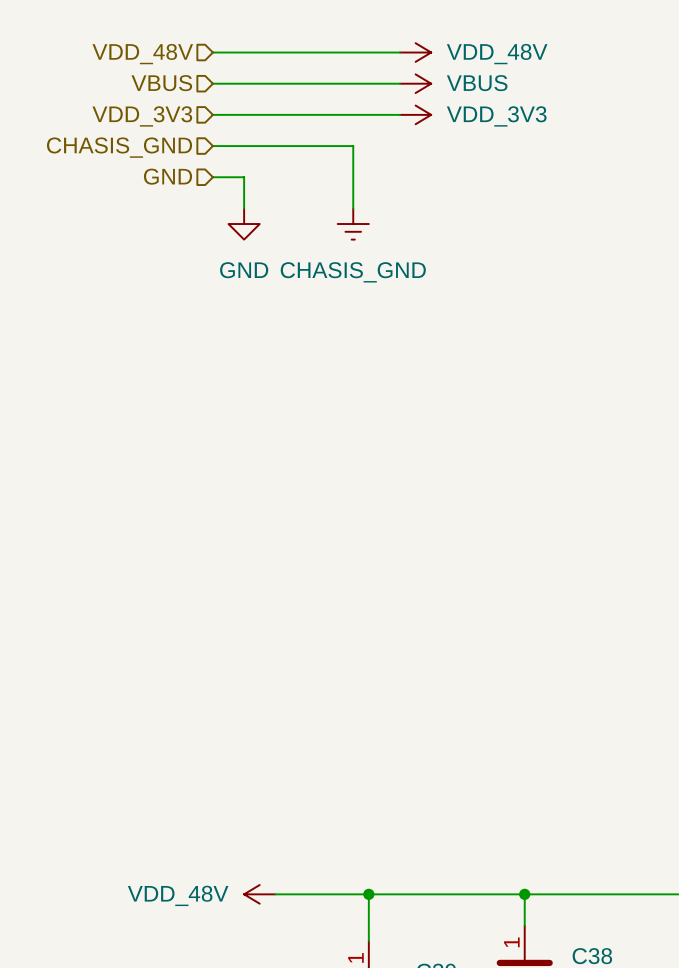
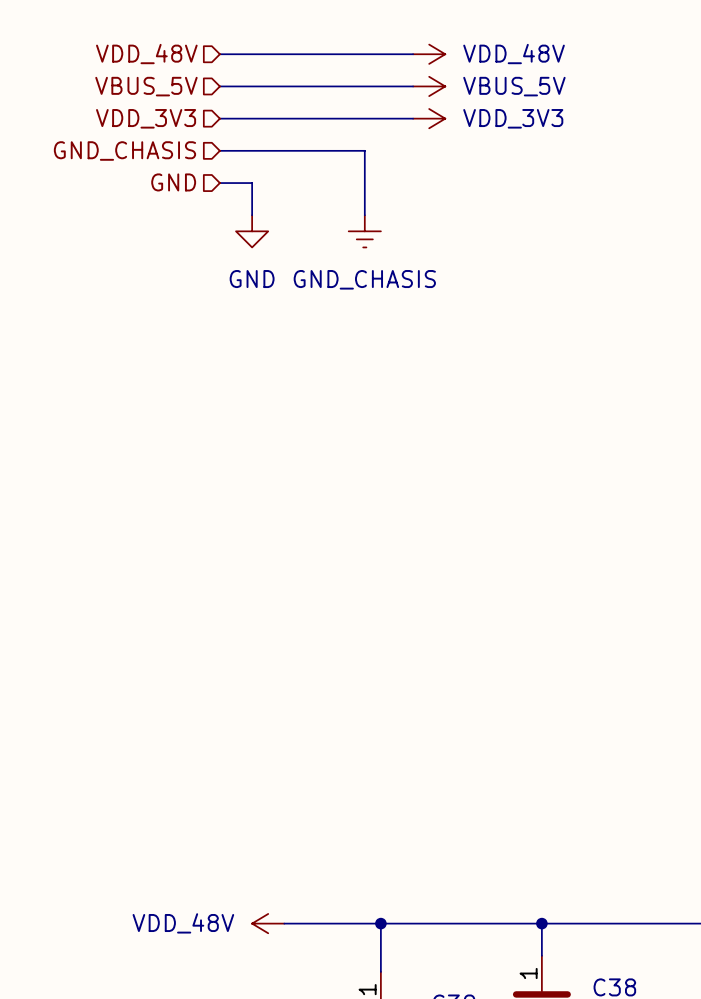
hierarchical label: VBUS (161, 83) -> VBUS_5V (146, 86)
power symbol: VBUS (415, 83) -> VBUS_5V (429, 86)
hierarchical label: CHASIS_GND (119, 147) -> GND_CHASIS (124, 151)
power symbol: CHASIS_GND (353, 224) -> GND_CHASIS (364, 231)

